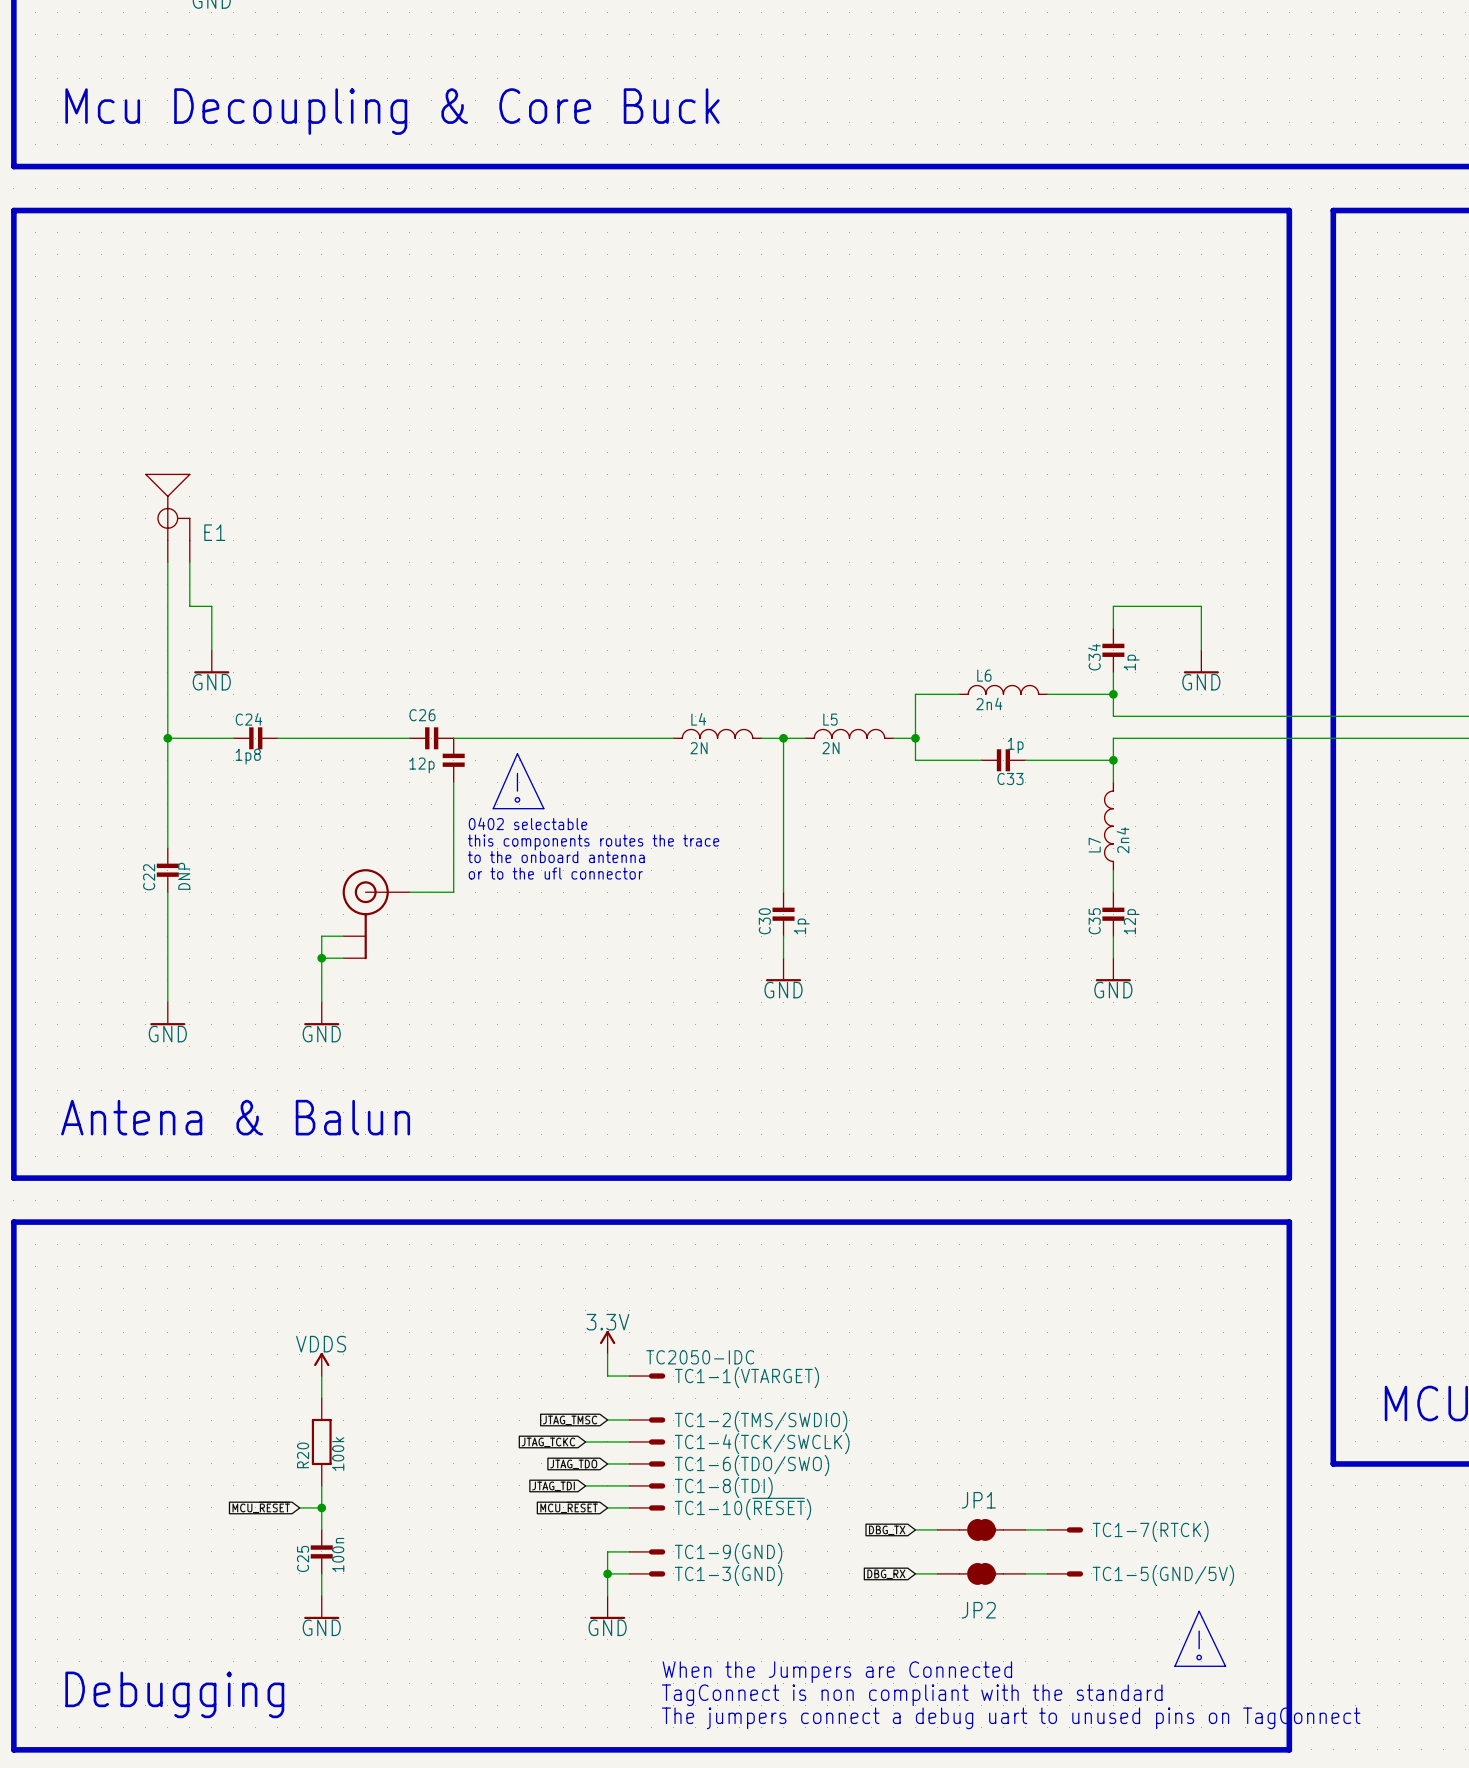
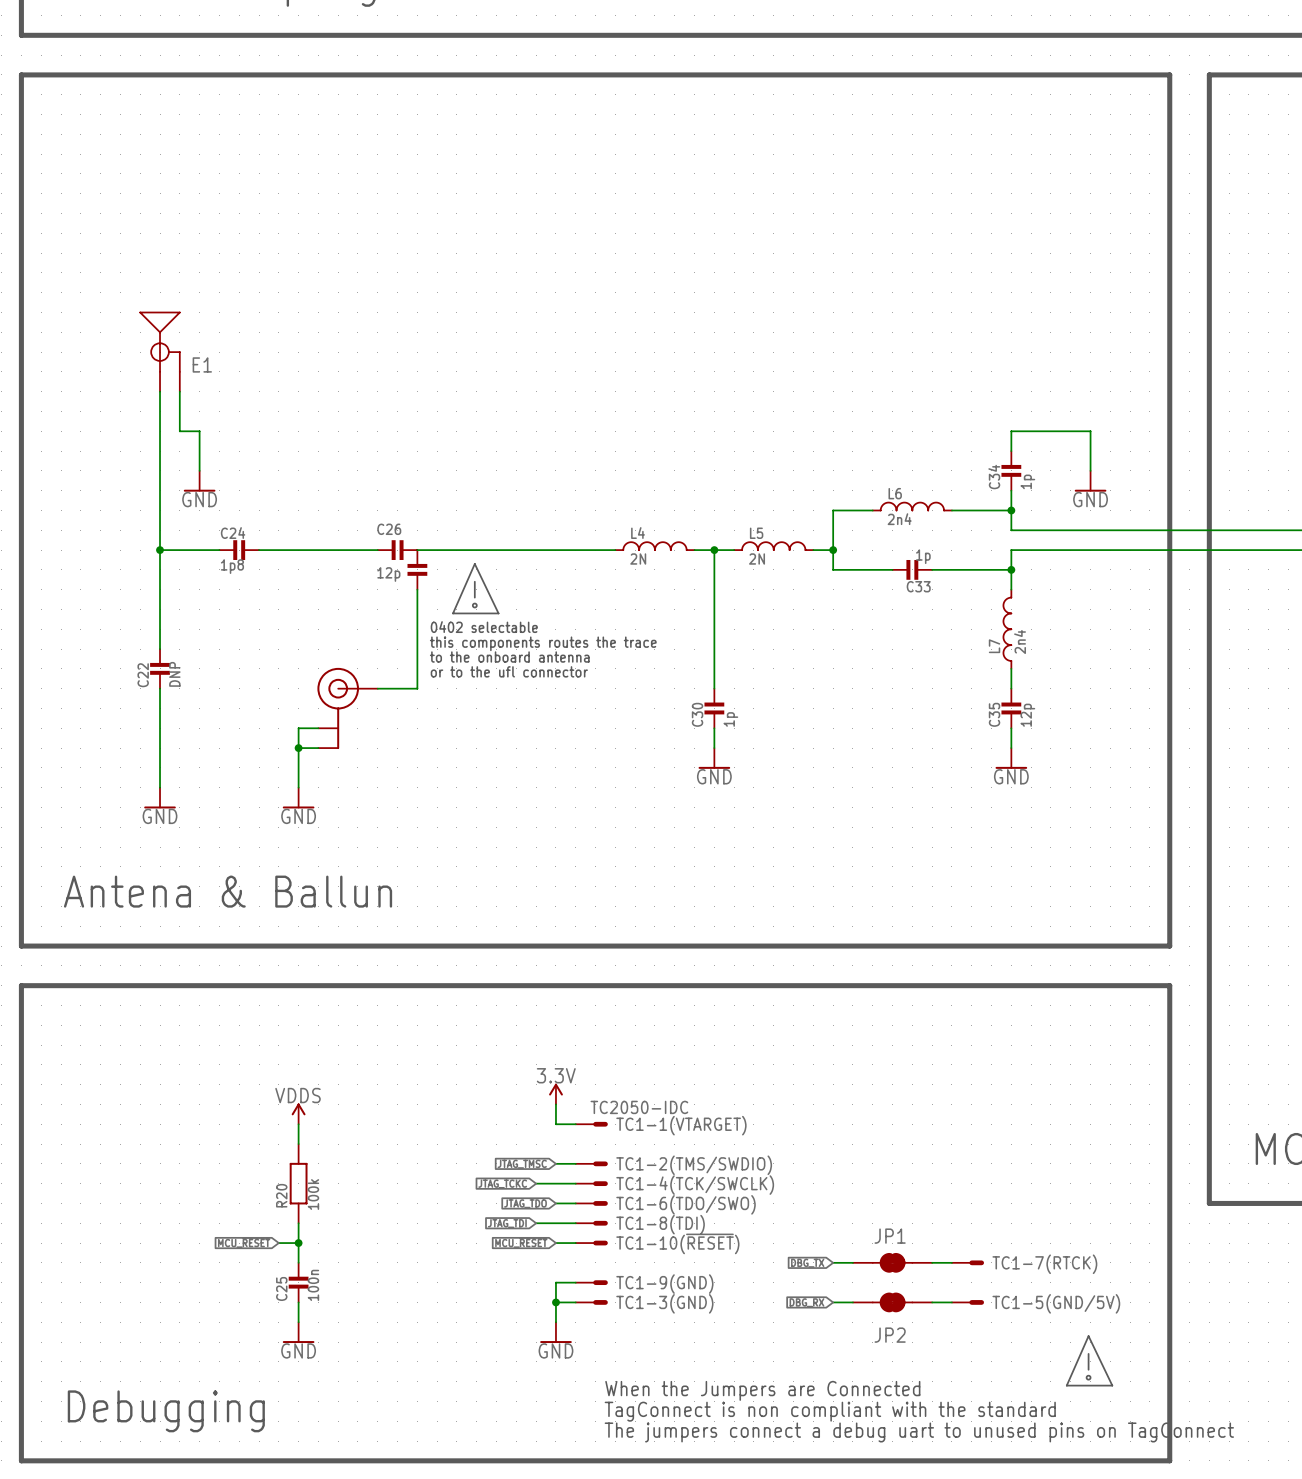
text: Antena & Balun (235, 1117) -> Antena & Ballun (228, 891)

